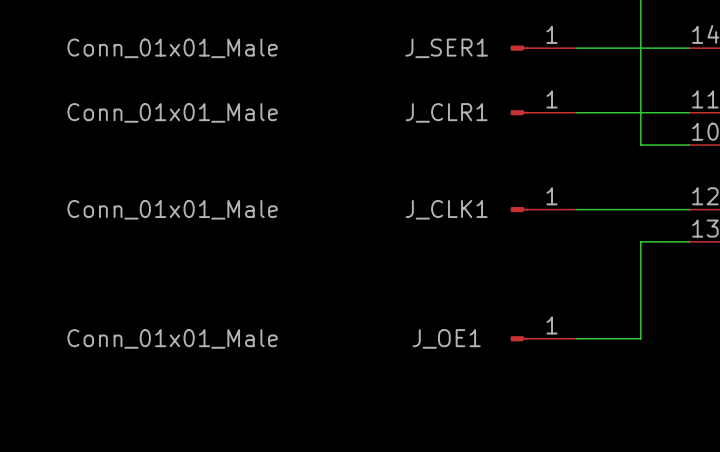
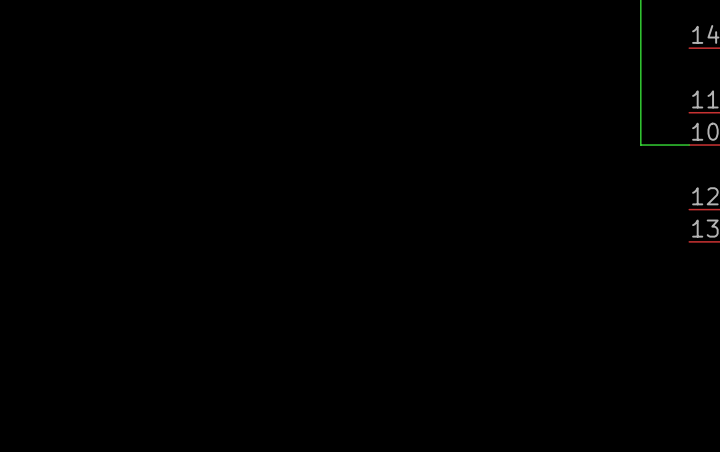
J_SER1: Conn_01x01_Male (543, 48) -> none
wire: (576, 48) (689, 48) -> none
J_CLR1: Conn_01x01_Male (543, 112) -> none
wire: (576, 112) (689, 112) -> none
J_CLK1: Conn_01x01_Male (543, 209) -> none
wire: (576, 209) (689, 209) -> none
wire: (689, 241) (640, 241) (640, 338) (576, 338) -> none
J_OE1: Conn_01x01_Male (543, 338) -> none

